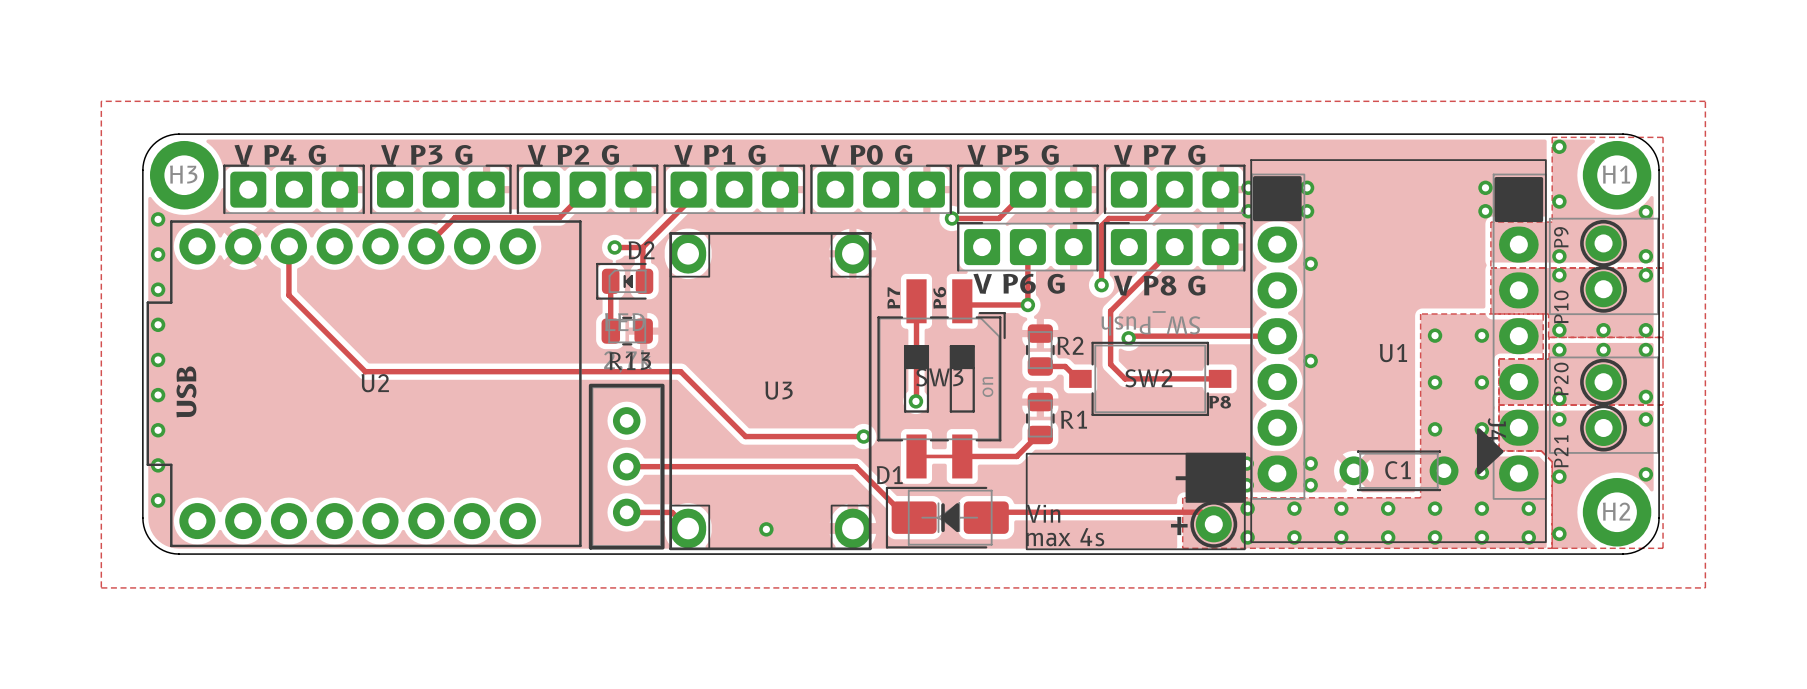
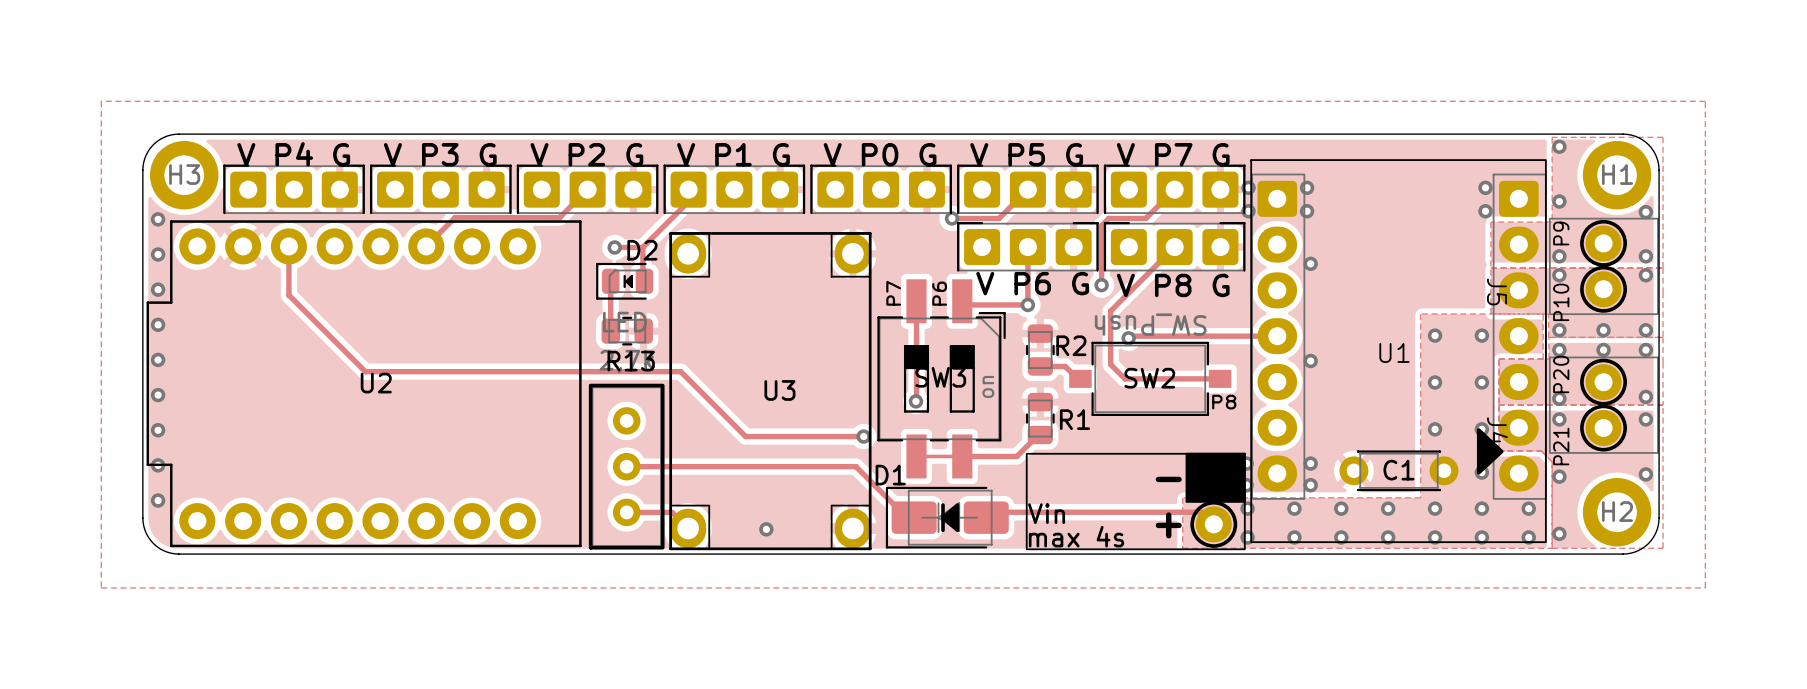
drawing: [1253, 176, 1302, 222] -> none
drawing: [1494, 177, 1544, 223] -> none
J5 name: none -> J5 (1496, 291)
text: USB (186, 391) -> none

